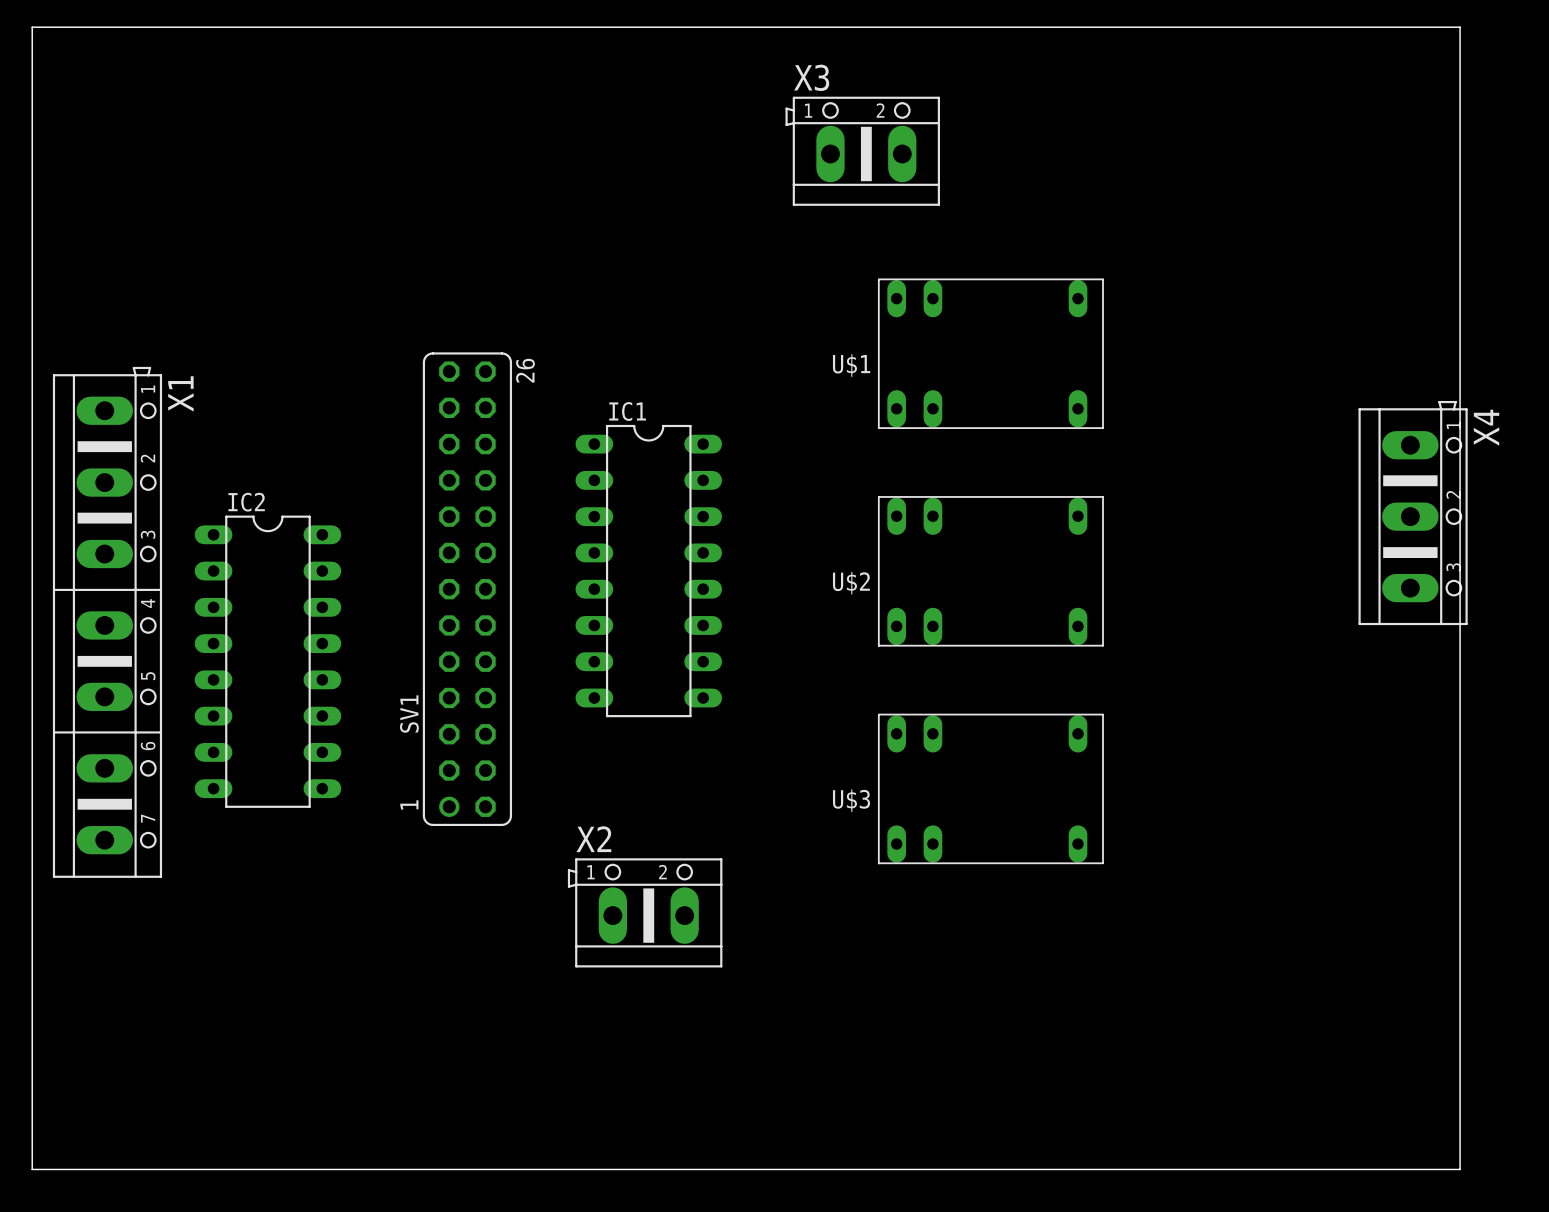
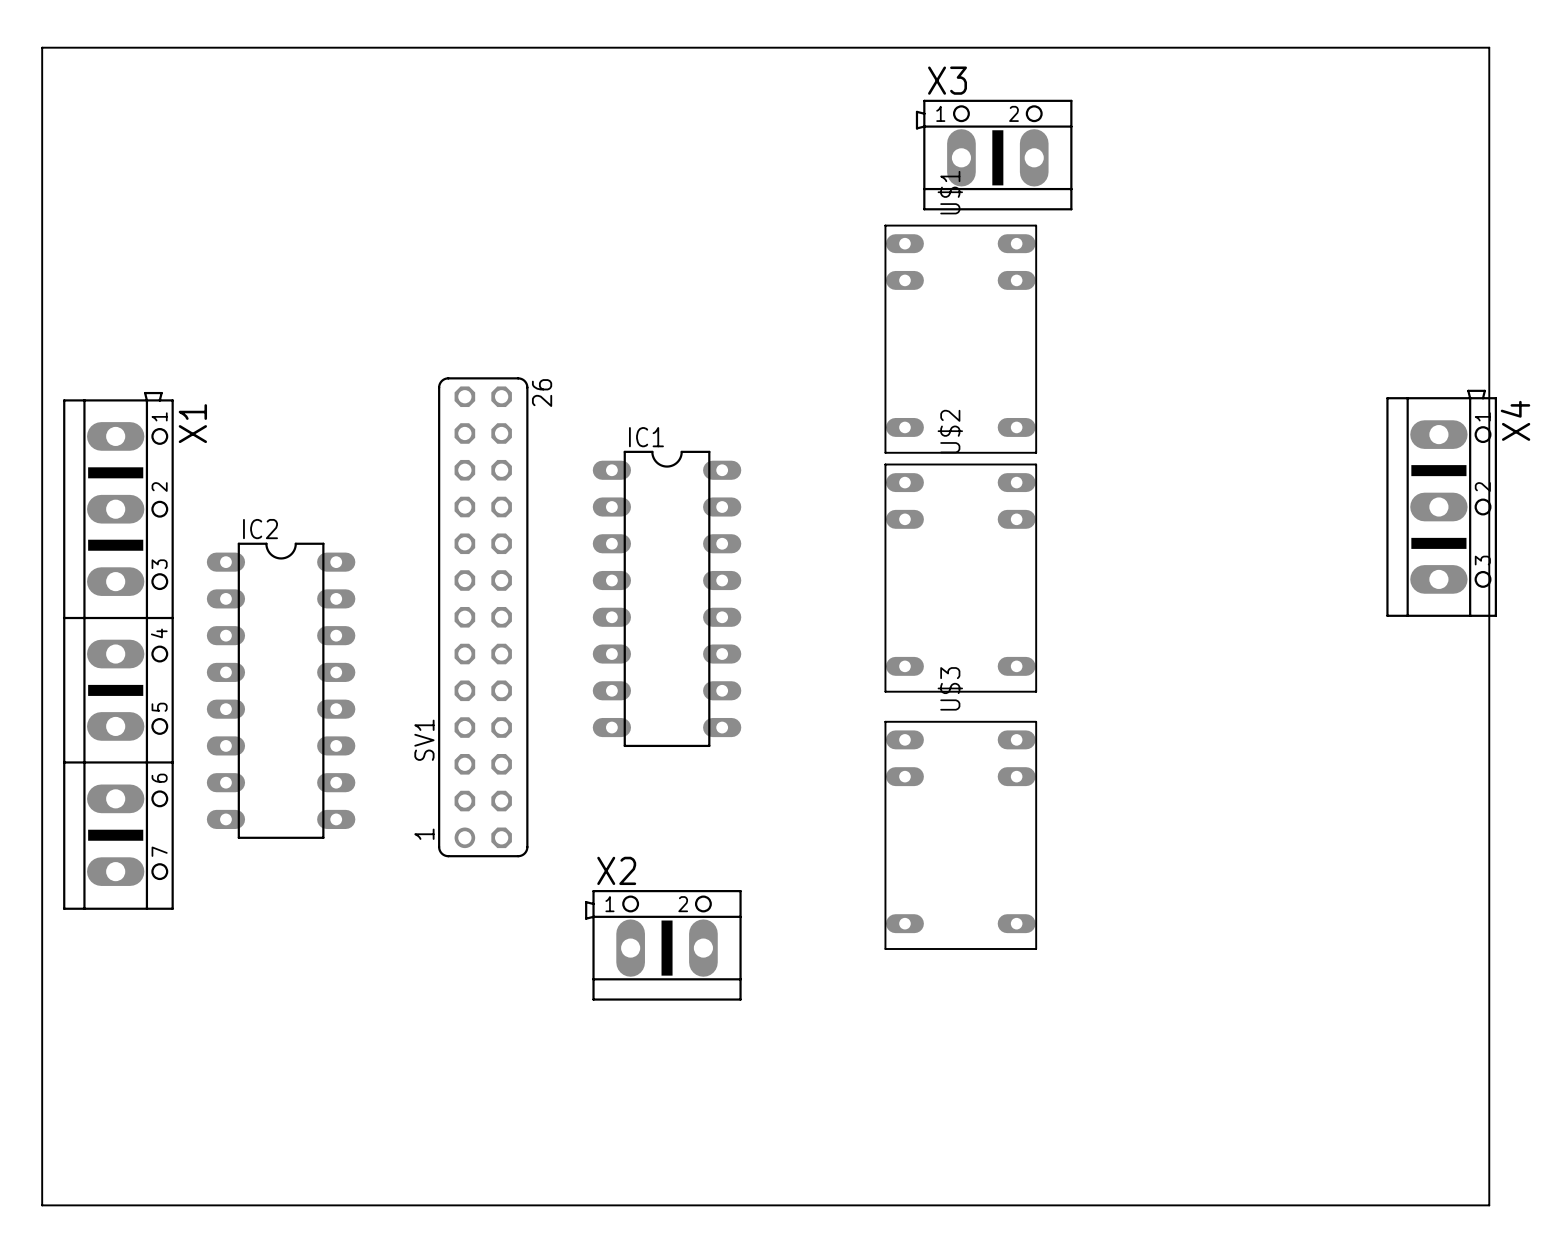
X3 position: (862, 151) -> (994, 155)
U$1 rotation: 0° (990, 353) -> 90° clockwise (960, 339)
X4 position: (1413, 513) -> (1441, 503)
U$2 rotation: 0° (990, 571) -> 90° clockwise (960, 578)
U$3 rotation: 0° (990, 789) -> 90° clockwise (960, 835)

